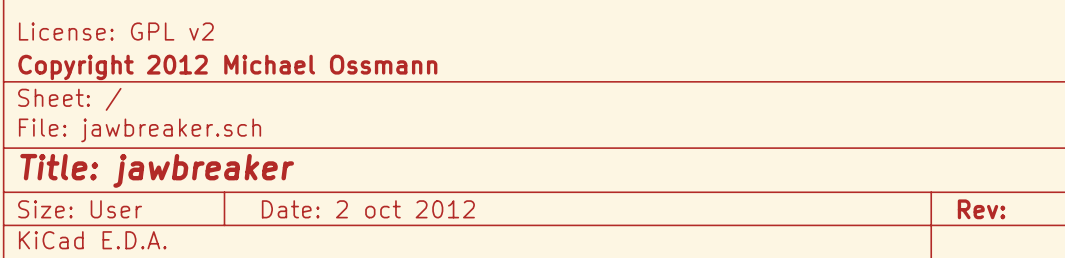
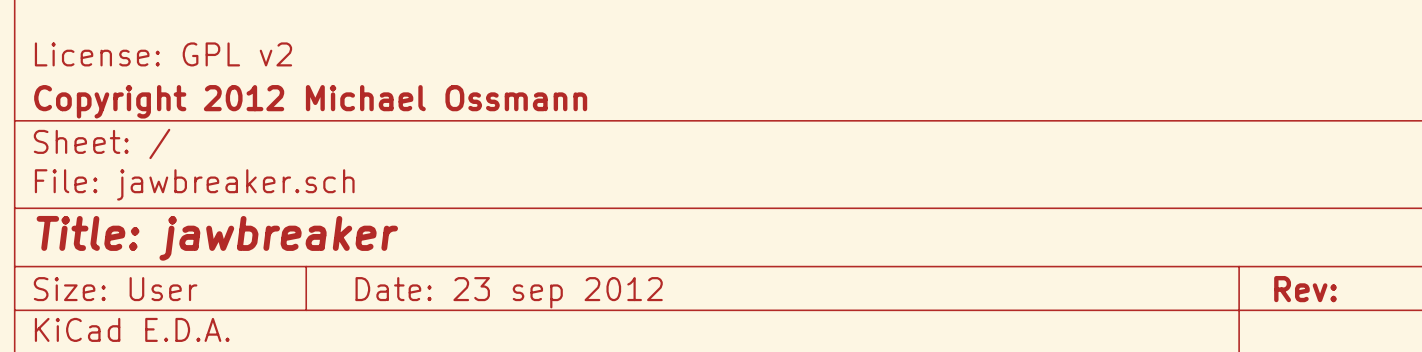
title block: Date: 2 oct 2012 (368, 209) -> Date: 23 sep 2012 (509, 292)

